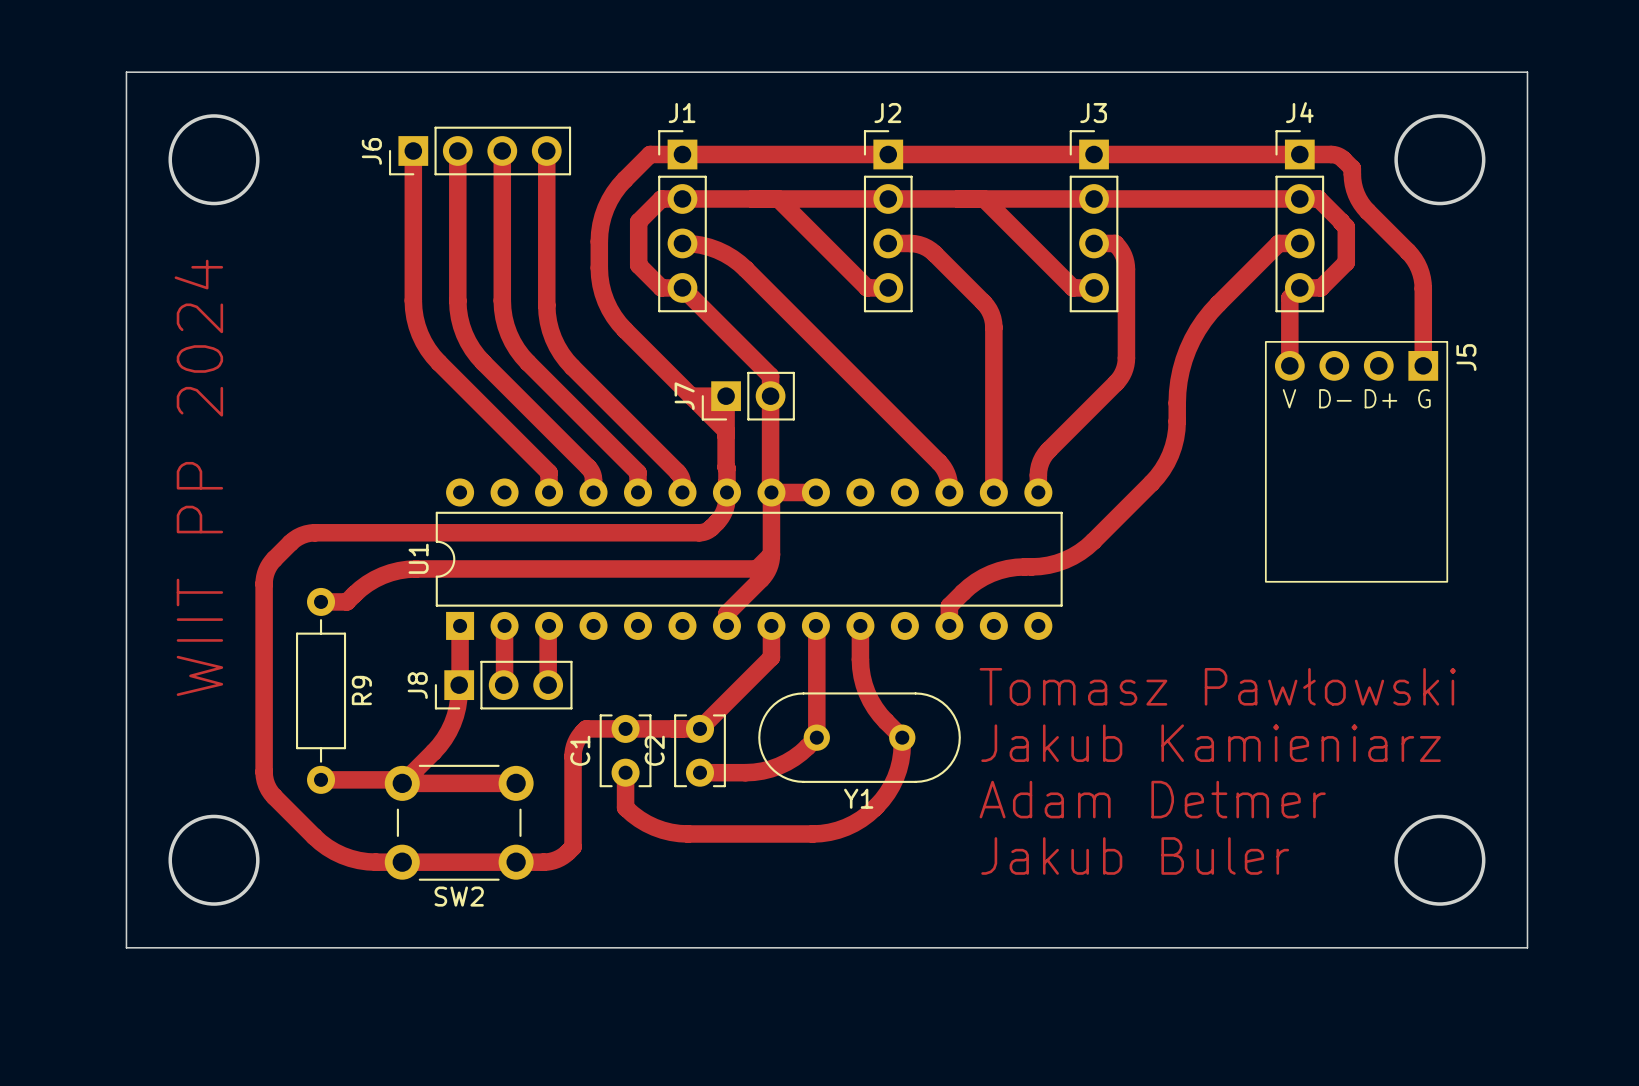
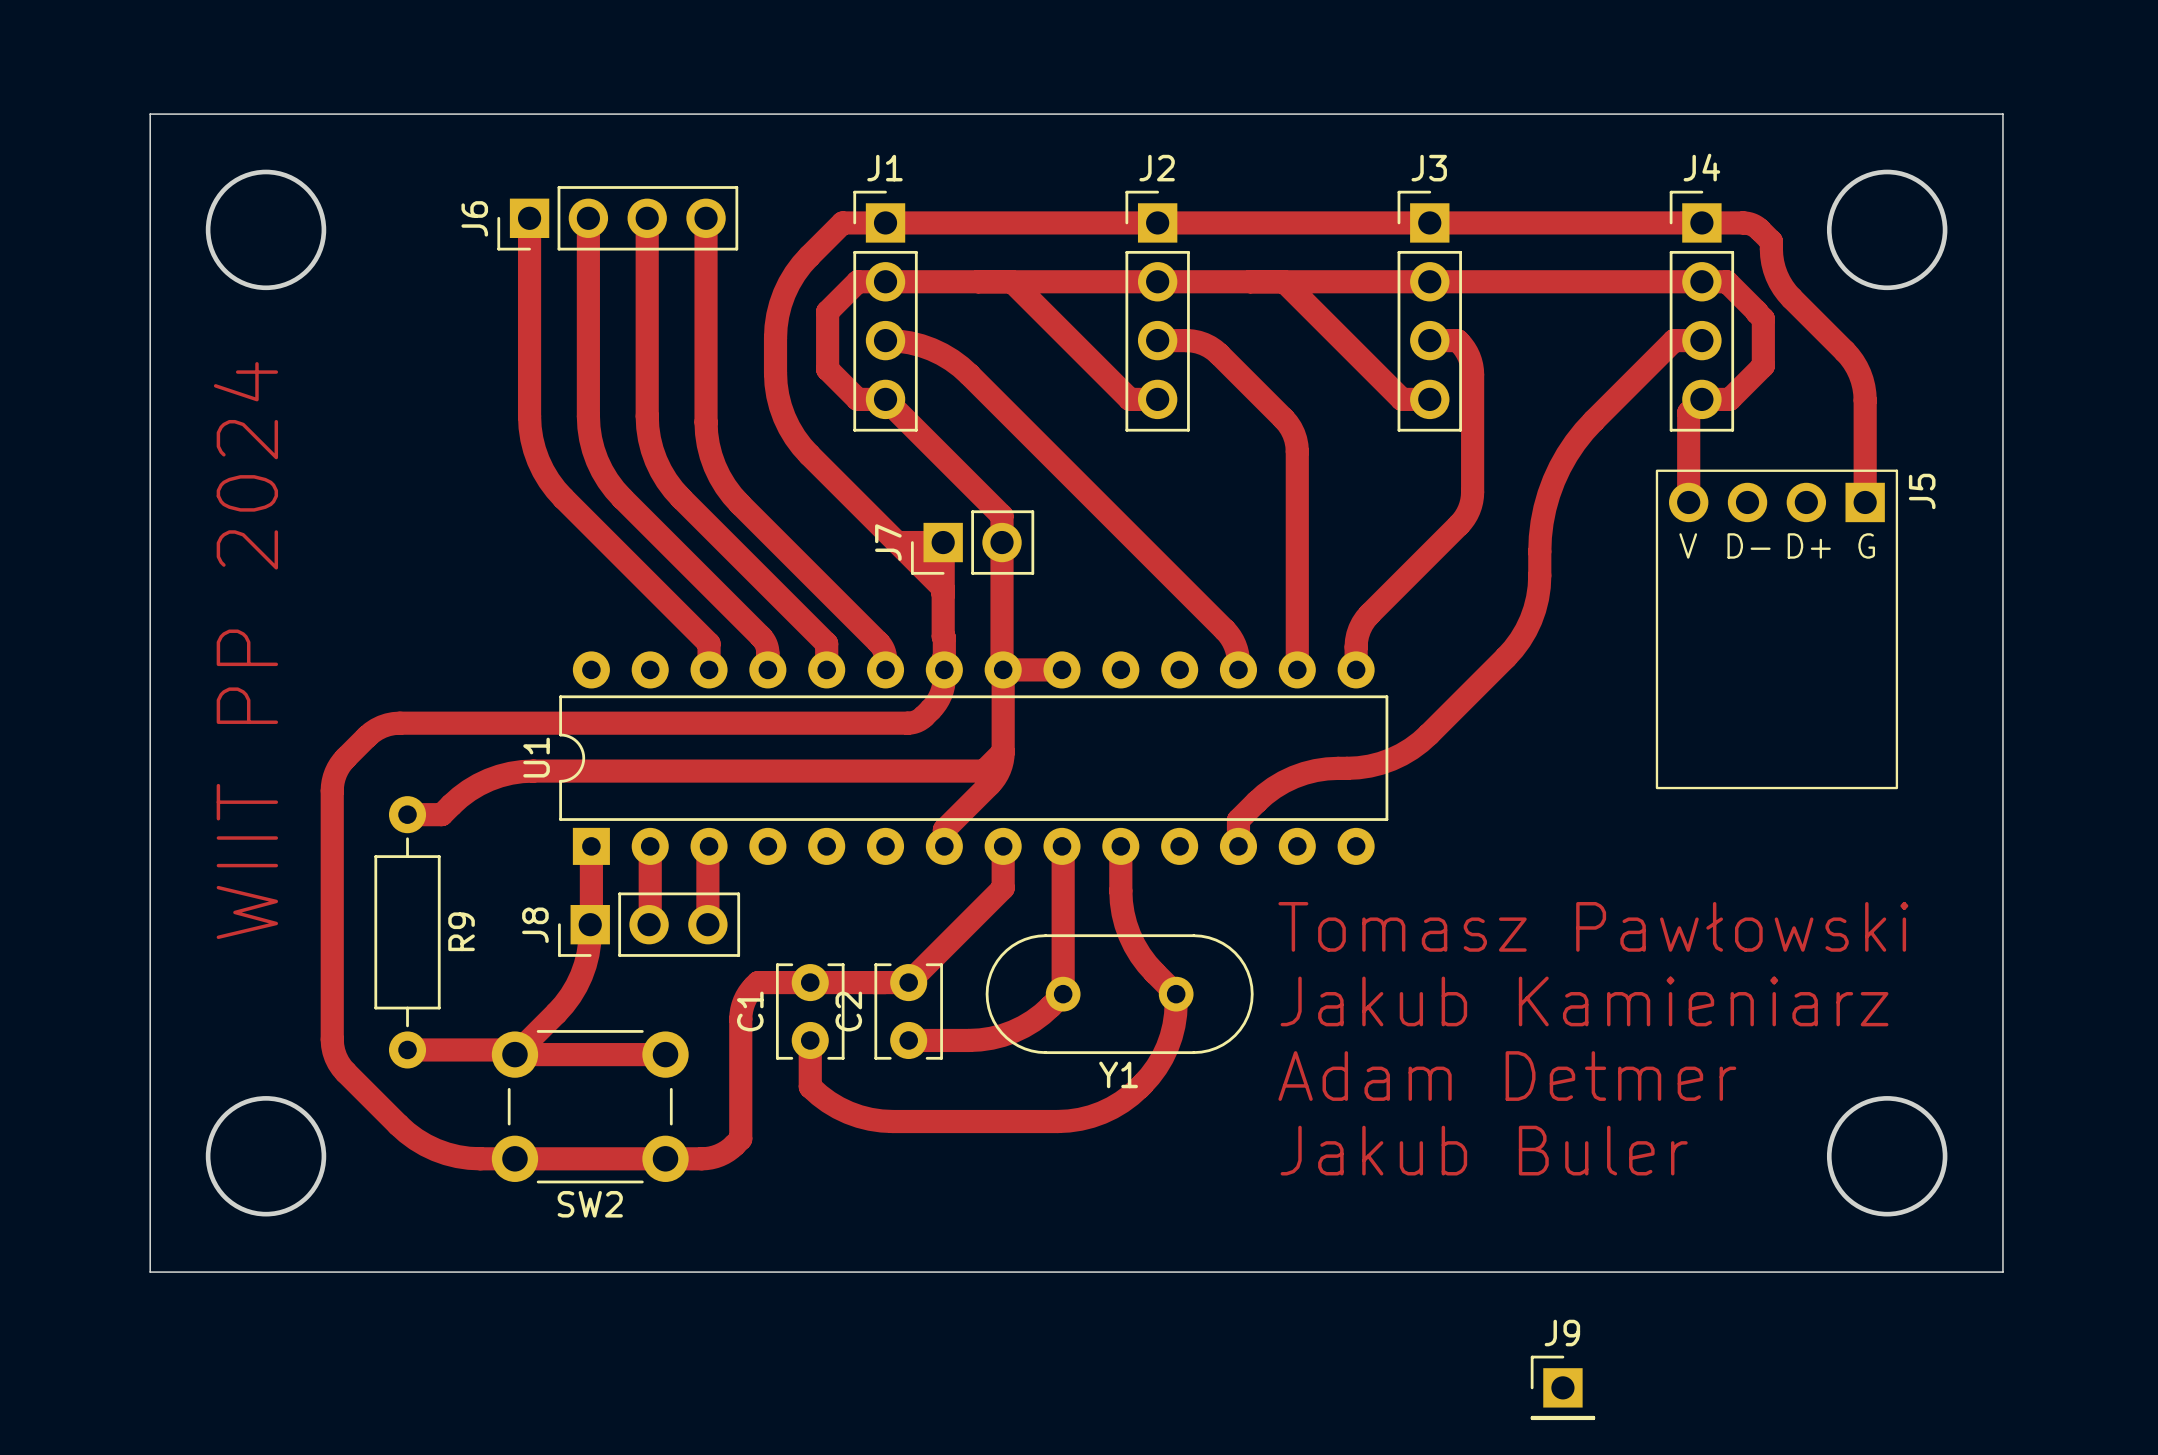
J9: none -> (1562, 1387)

